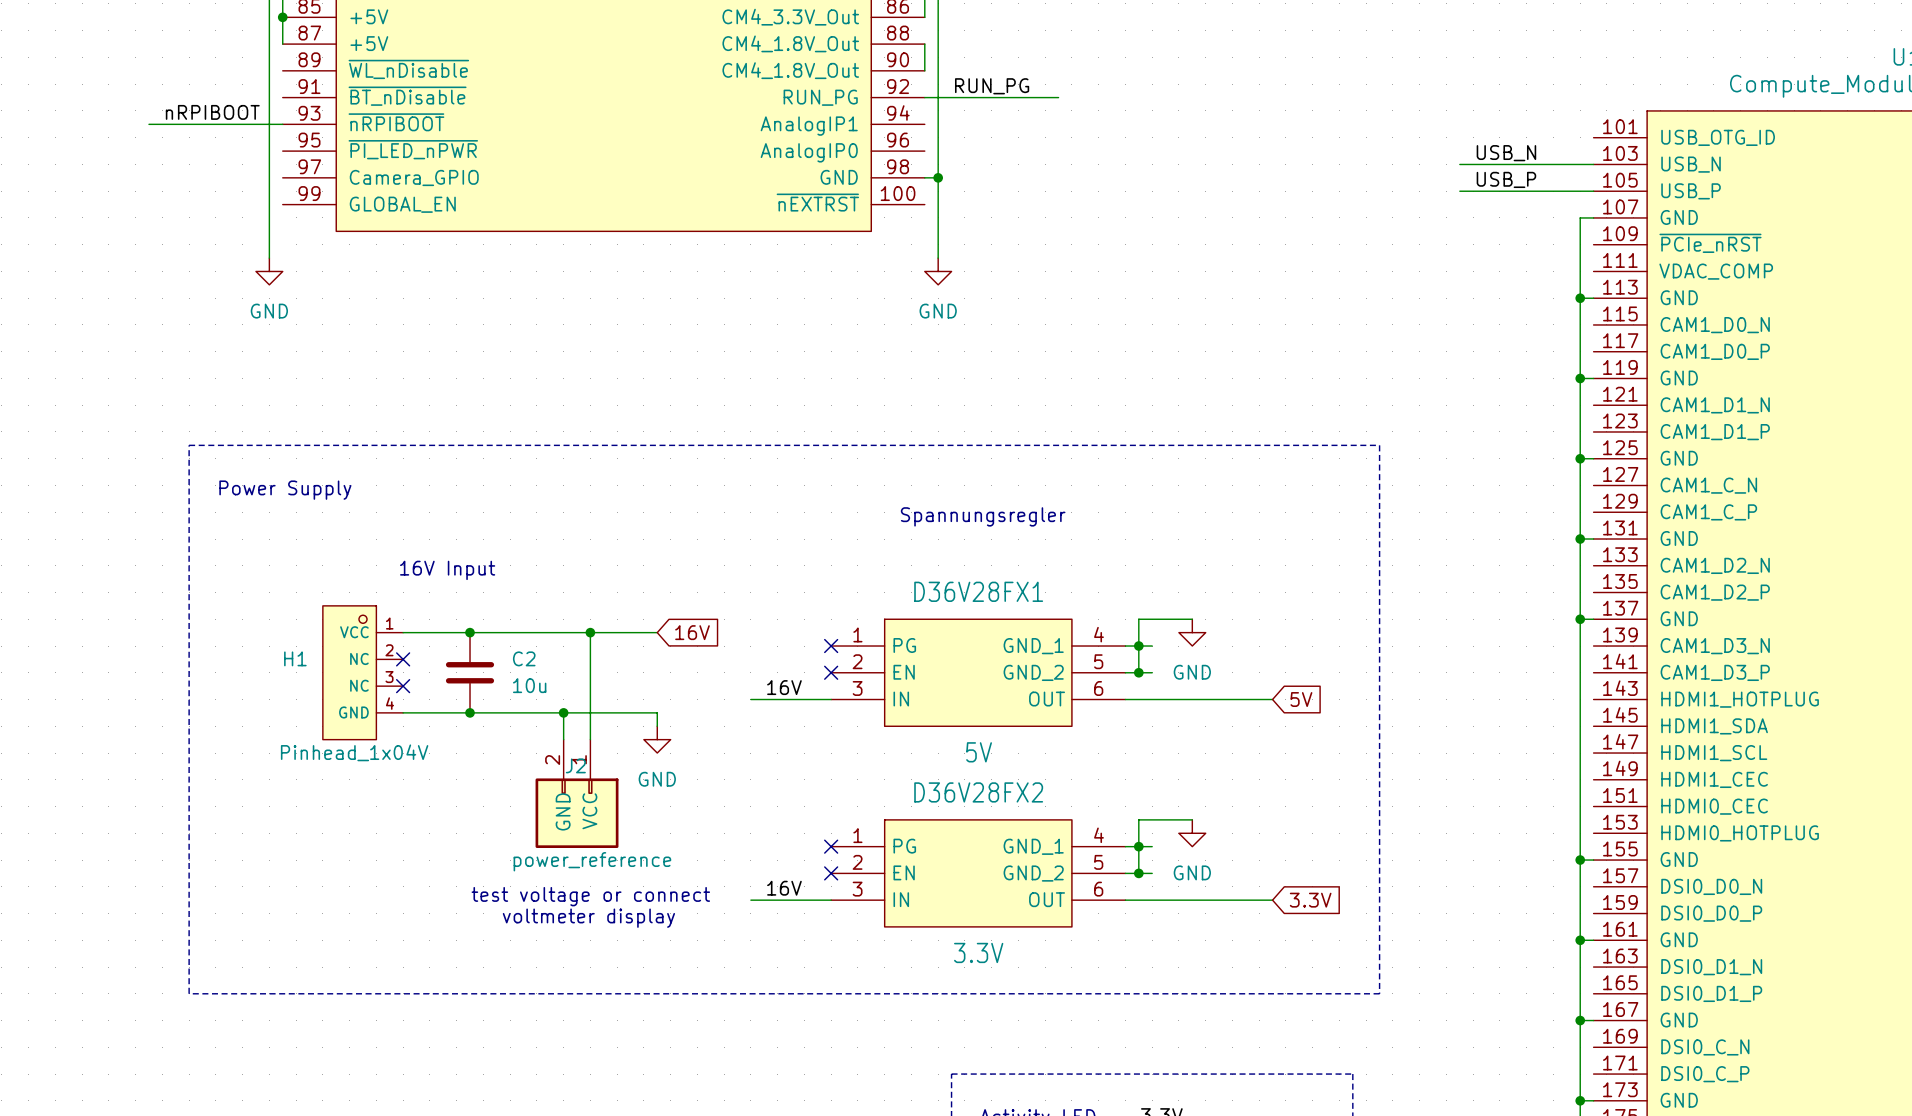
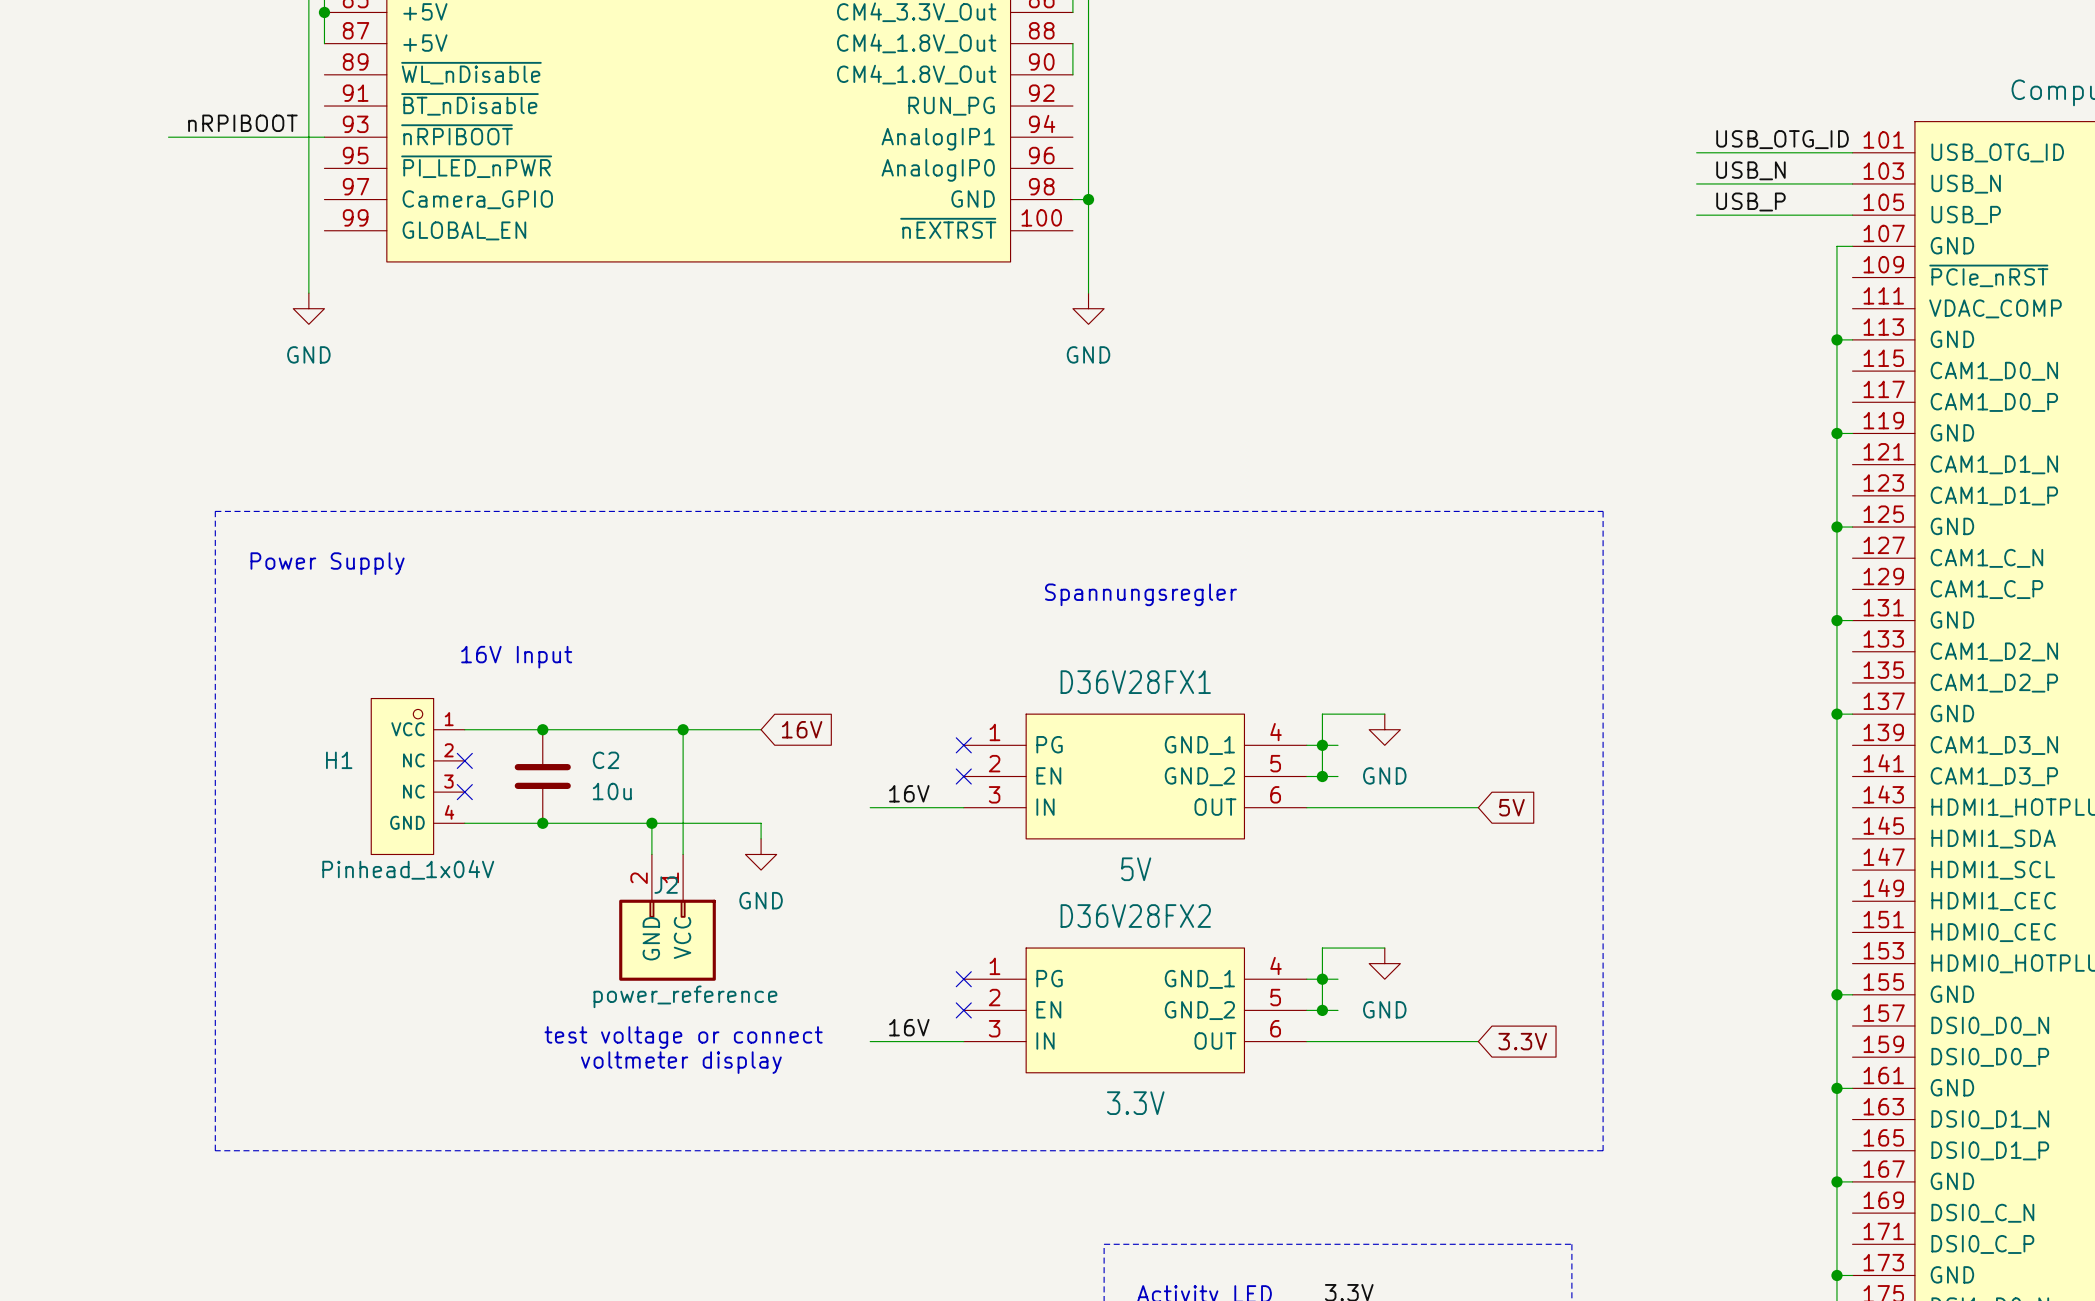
label: RUN_PG (992, 86) -> none
wire: (924, 97) (1058, 97) -> none
label: none -> USB_OTG_ID (1782, 139)
wire: none -> (1696, 152) (1852, 152)

